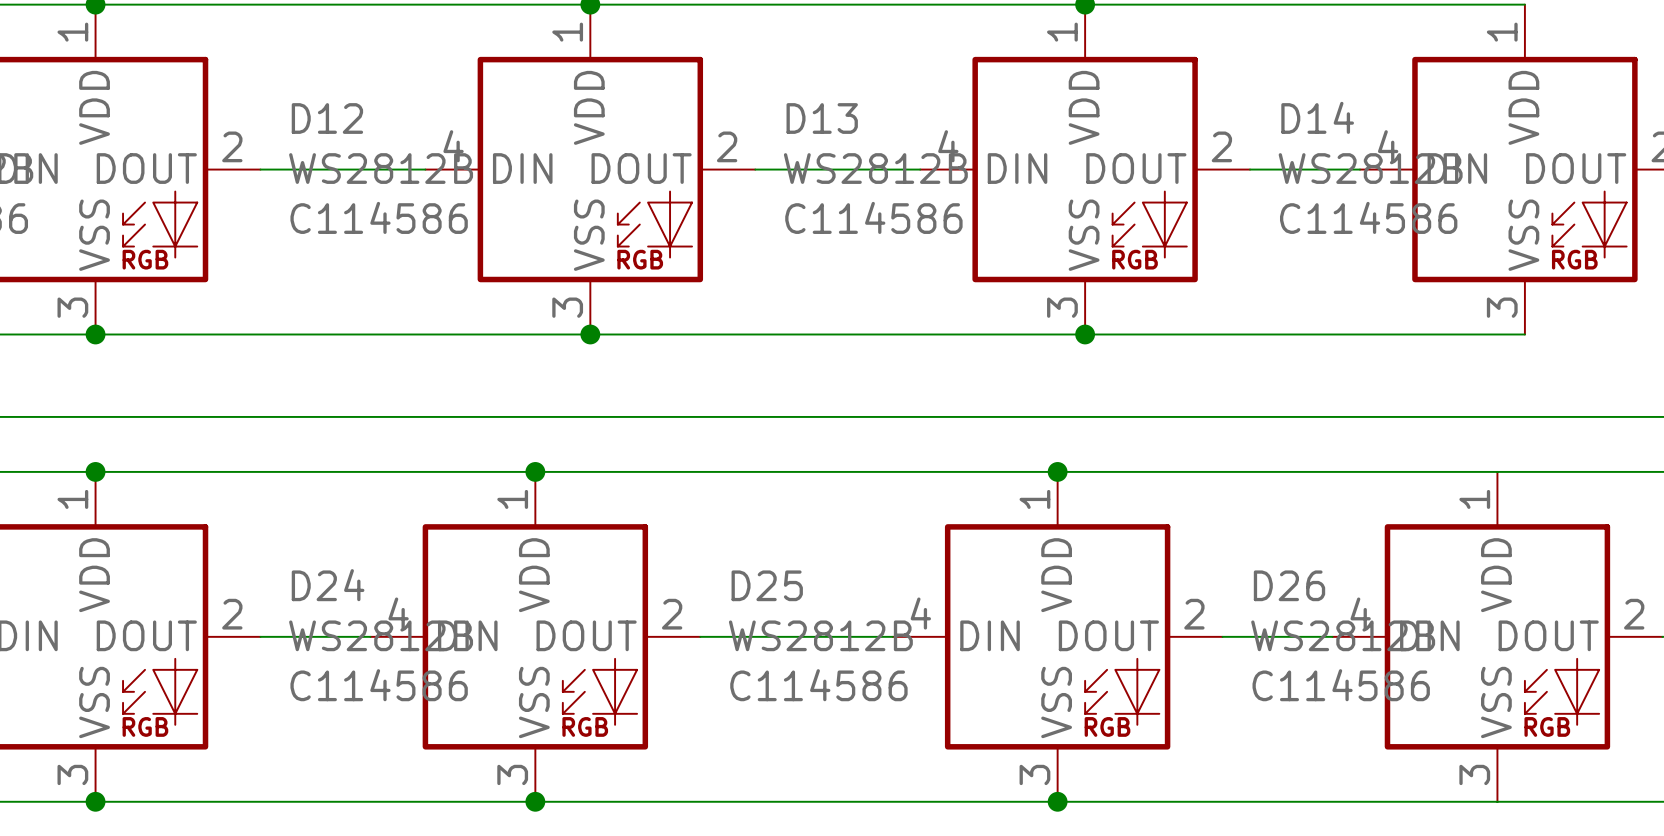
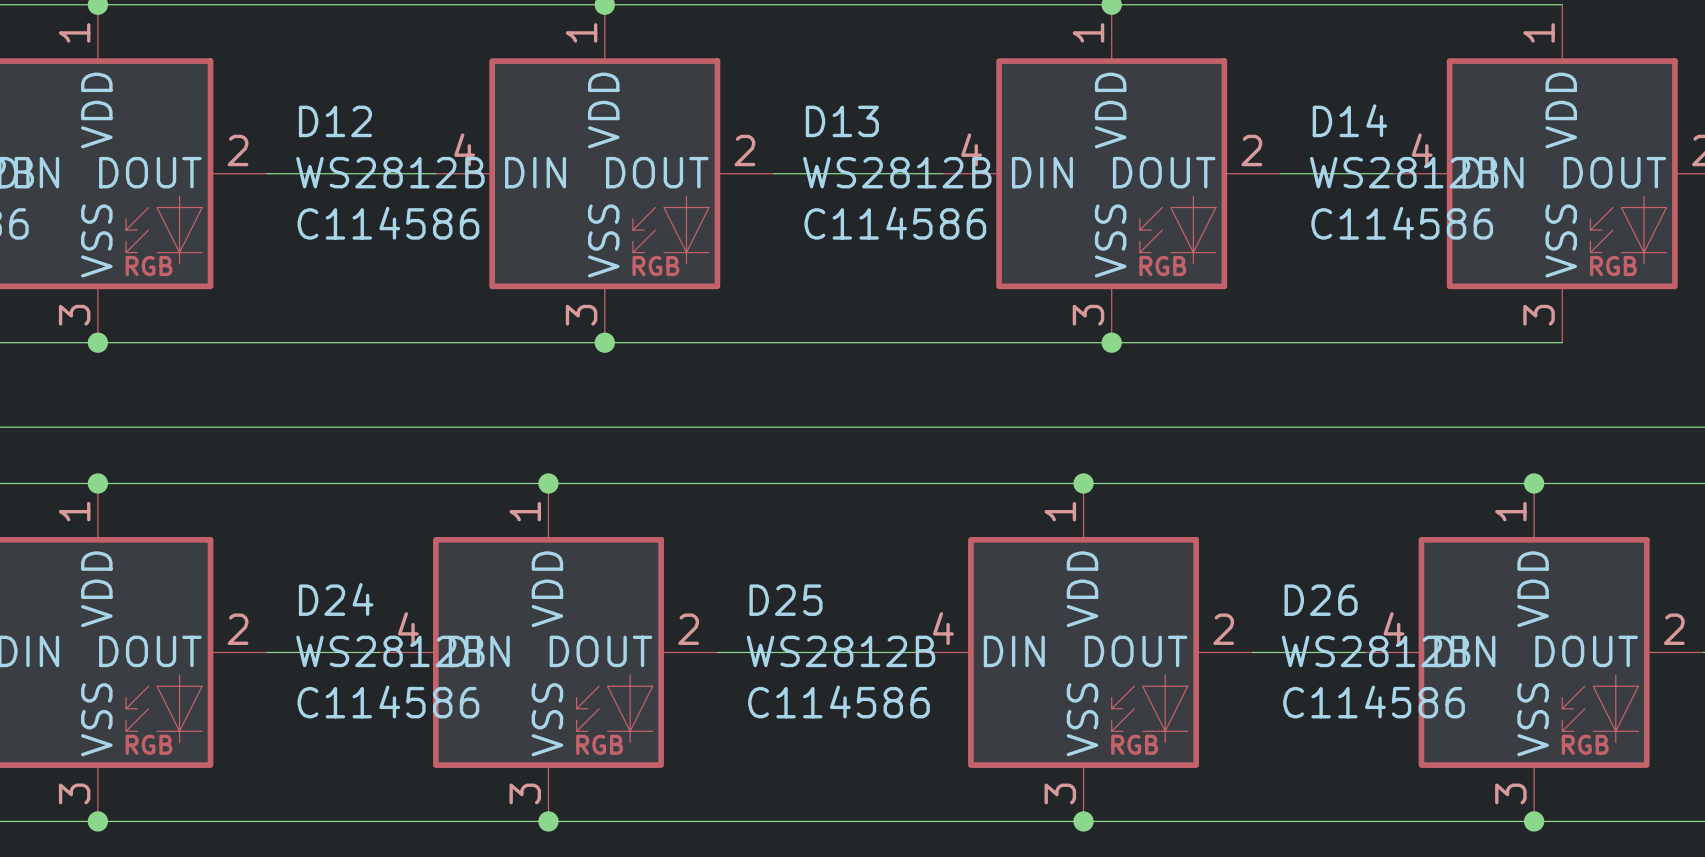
junction: none -> (1534, 483)
junction: none -> (1534, 821)

